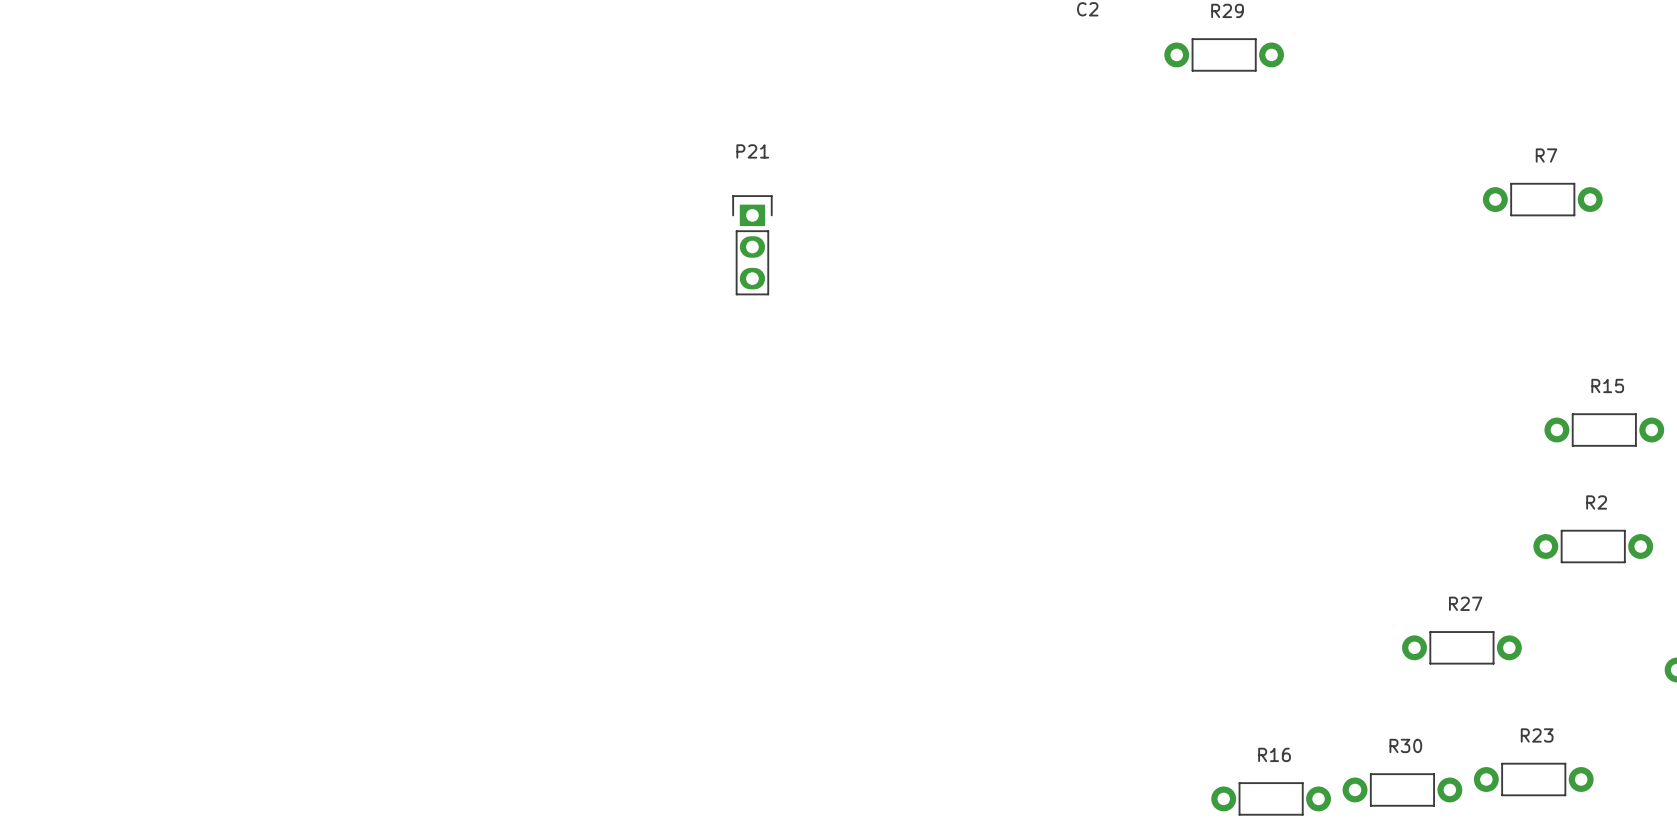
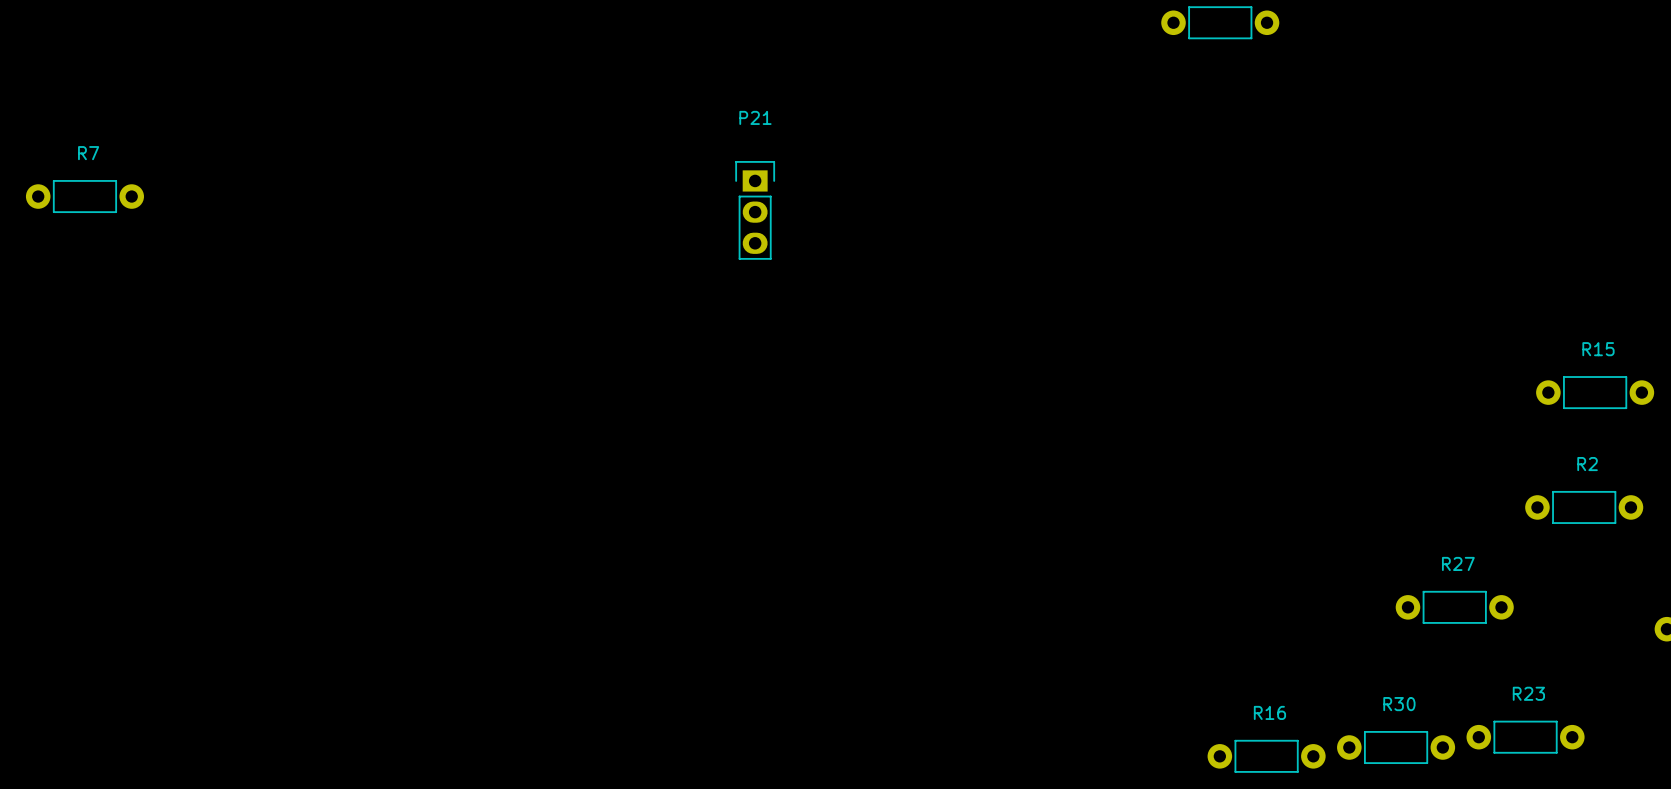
R7 position: (1542, 199) -> (84, 196)

